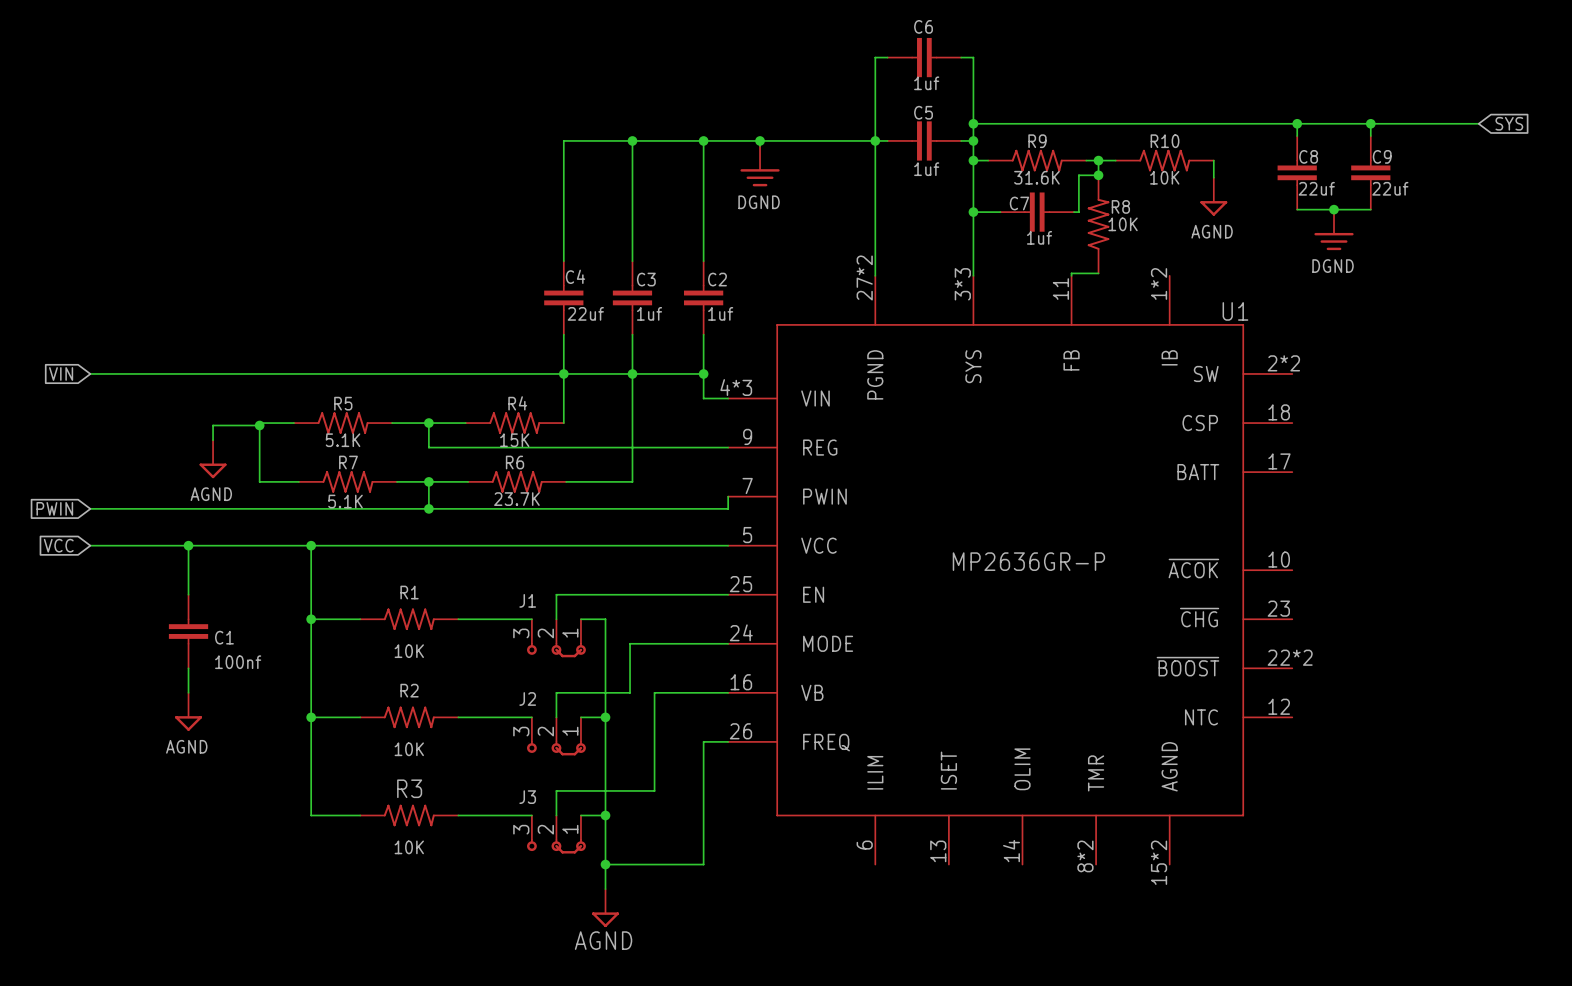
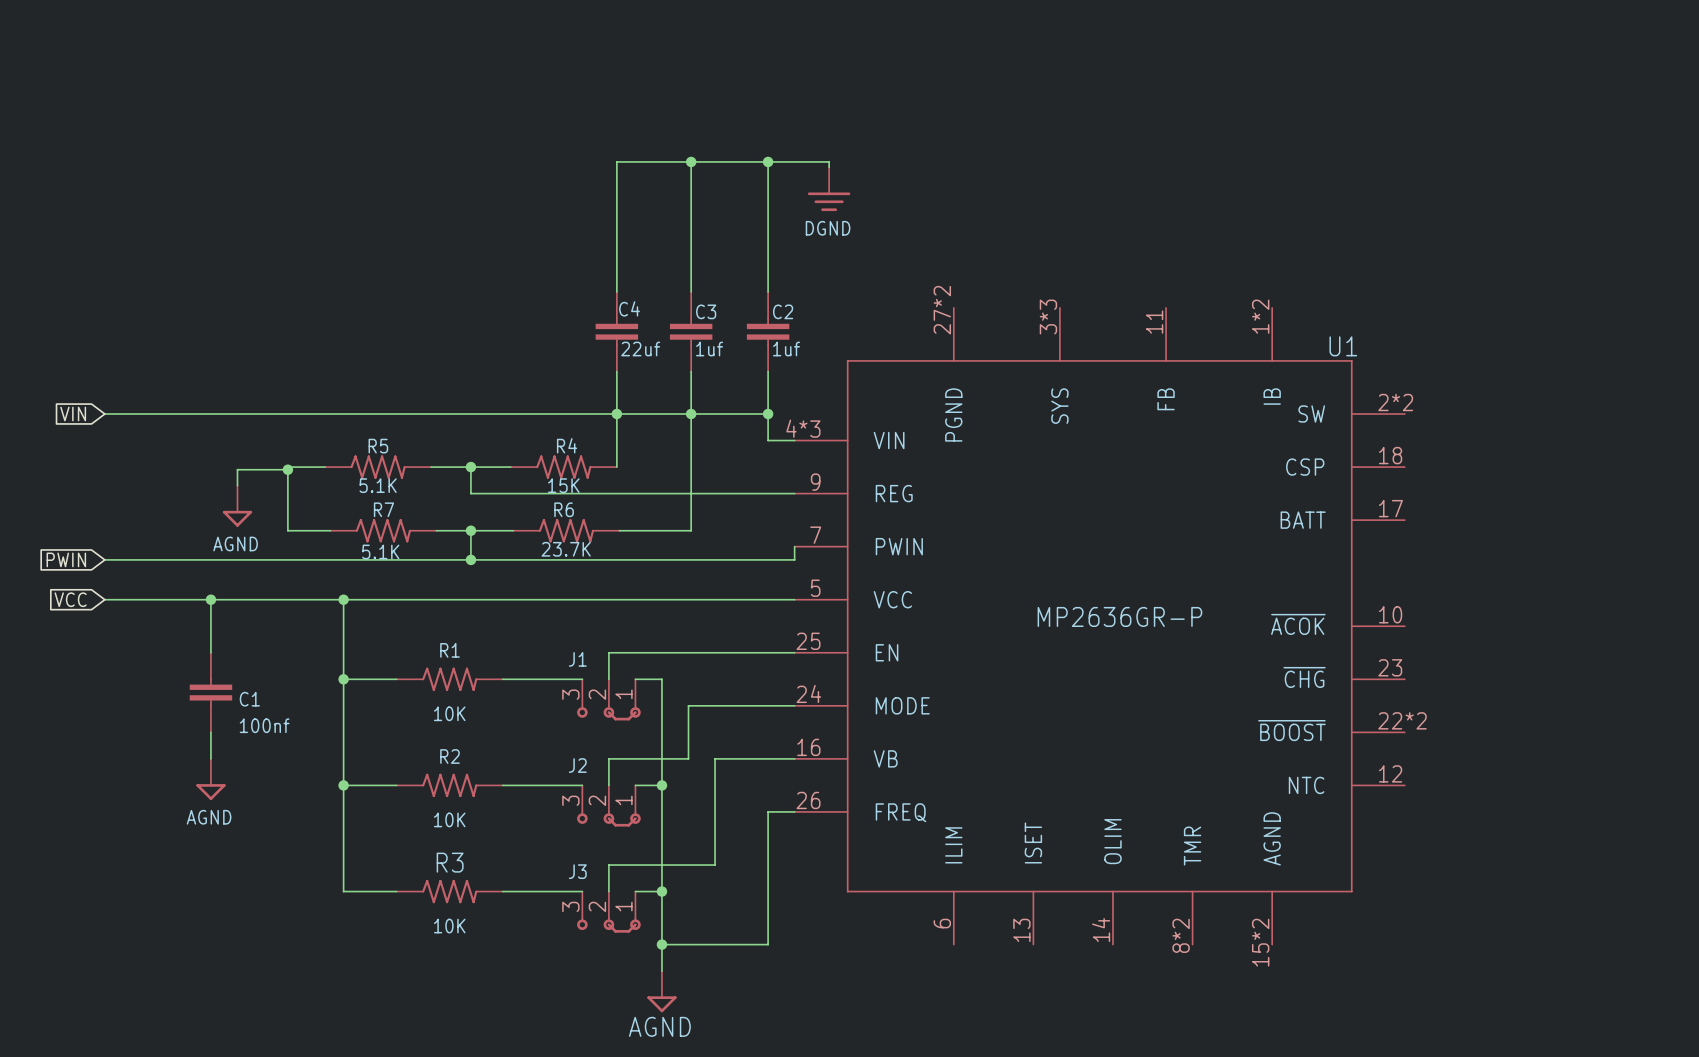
wire: (887, 57) (875, 57) (875, 275) -> none
C6: 1uf (924, 57) -> none
wire: (961, 57) (973, 57) (973, 275) -> none
wire: (973, 123) (1478, 123) -> none
junction: (973, 123) -> none
wire: (1297, 123) (1297, 136) -> none
junction: (1297, 123) -> none
wire: (1370, 123) (1370, 136) -> none
junction: (1370, 123) -> none
global label: SYS (1509, 123) -> none
wire: (760, 140) (887, 140) -> none
junction: (760, 140) -> none
junction: (875, 140) -> none
C5: 1uf (924, 140) -> none
wire: (961, 140) (973, 140) -> none
junction: (973, 140) -> none
wire: (973, 160) (988, 160) -> none
junction: (973, 160) -> none
R9: 31.6K (1037, 160) -> none
wire: (1086, 160) (1115, 160) -> none
wire: (1098, 160) (1098, 175) (1078, 175) (1078, 212) (1074, 212) -> none
junction: (1098, 160) -> none
R10: 10K (1164, 160) -> none
wire: (1213, 160) (1213, 177) -> none
C8: 22uf (1297, 172) -> none
C9: 22uf (1370, 172) -> none
junction: (1098, 175) -> none
power symbol: AGND (1213, 196) -> none
wire: (1297, 209) (1370, 209) -> none
junction: (1334, 209) -> none
wire: (973, 212) (1000, 212) -> none
junction: (973, 212) -> none
C7: 1uf (1037, 212) -> none
R8: 10K (1098, 224) -> none
power symbol: DGND (1334, 229) -> none
wire: (1098, 273) (1071, 273) (1071, 275) -> none

